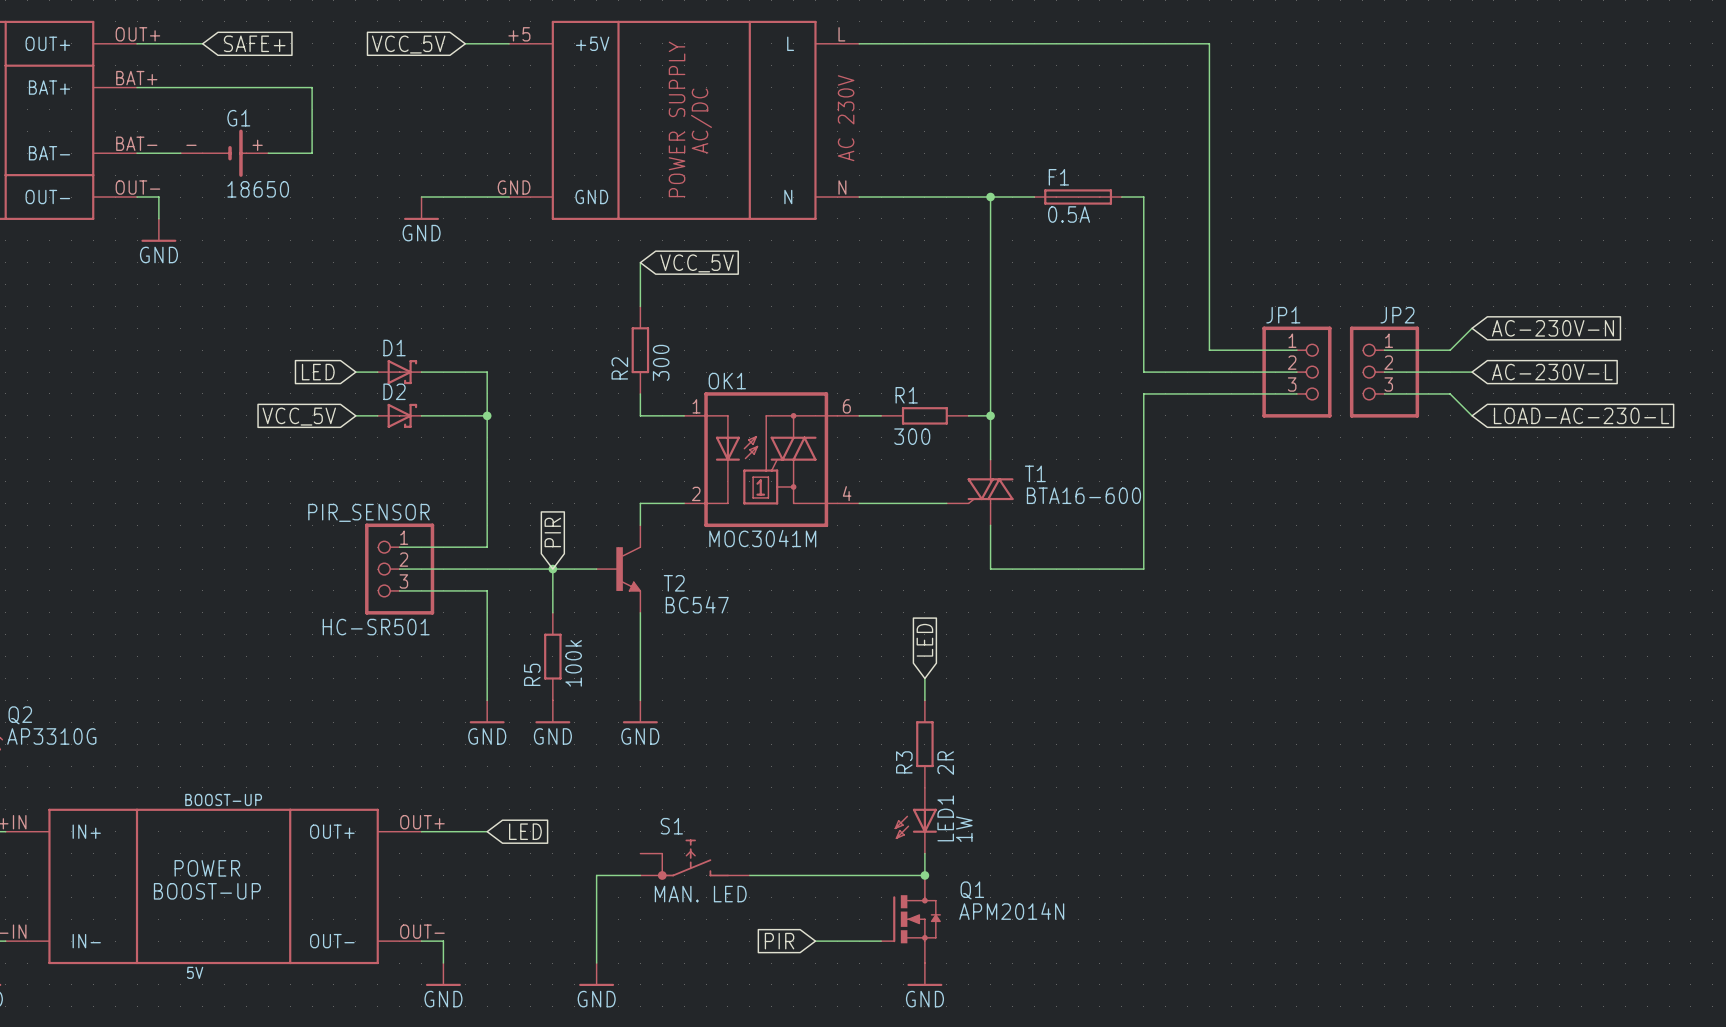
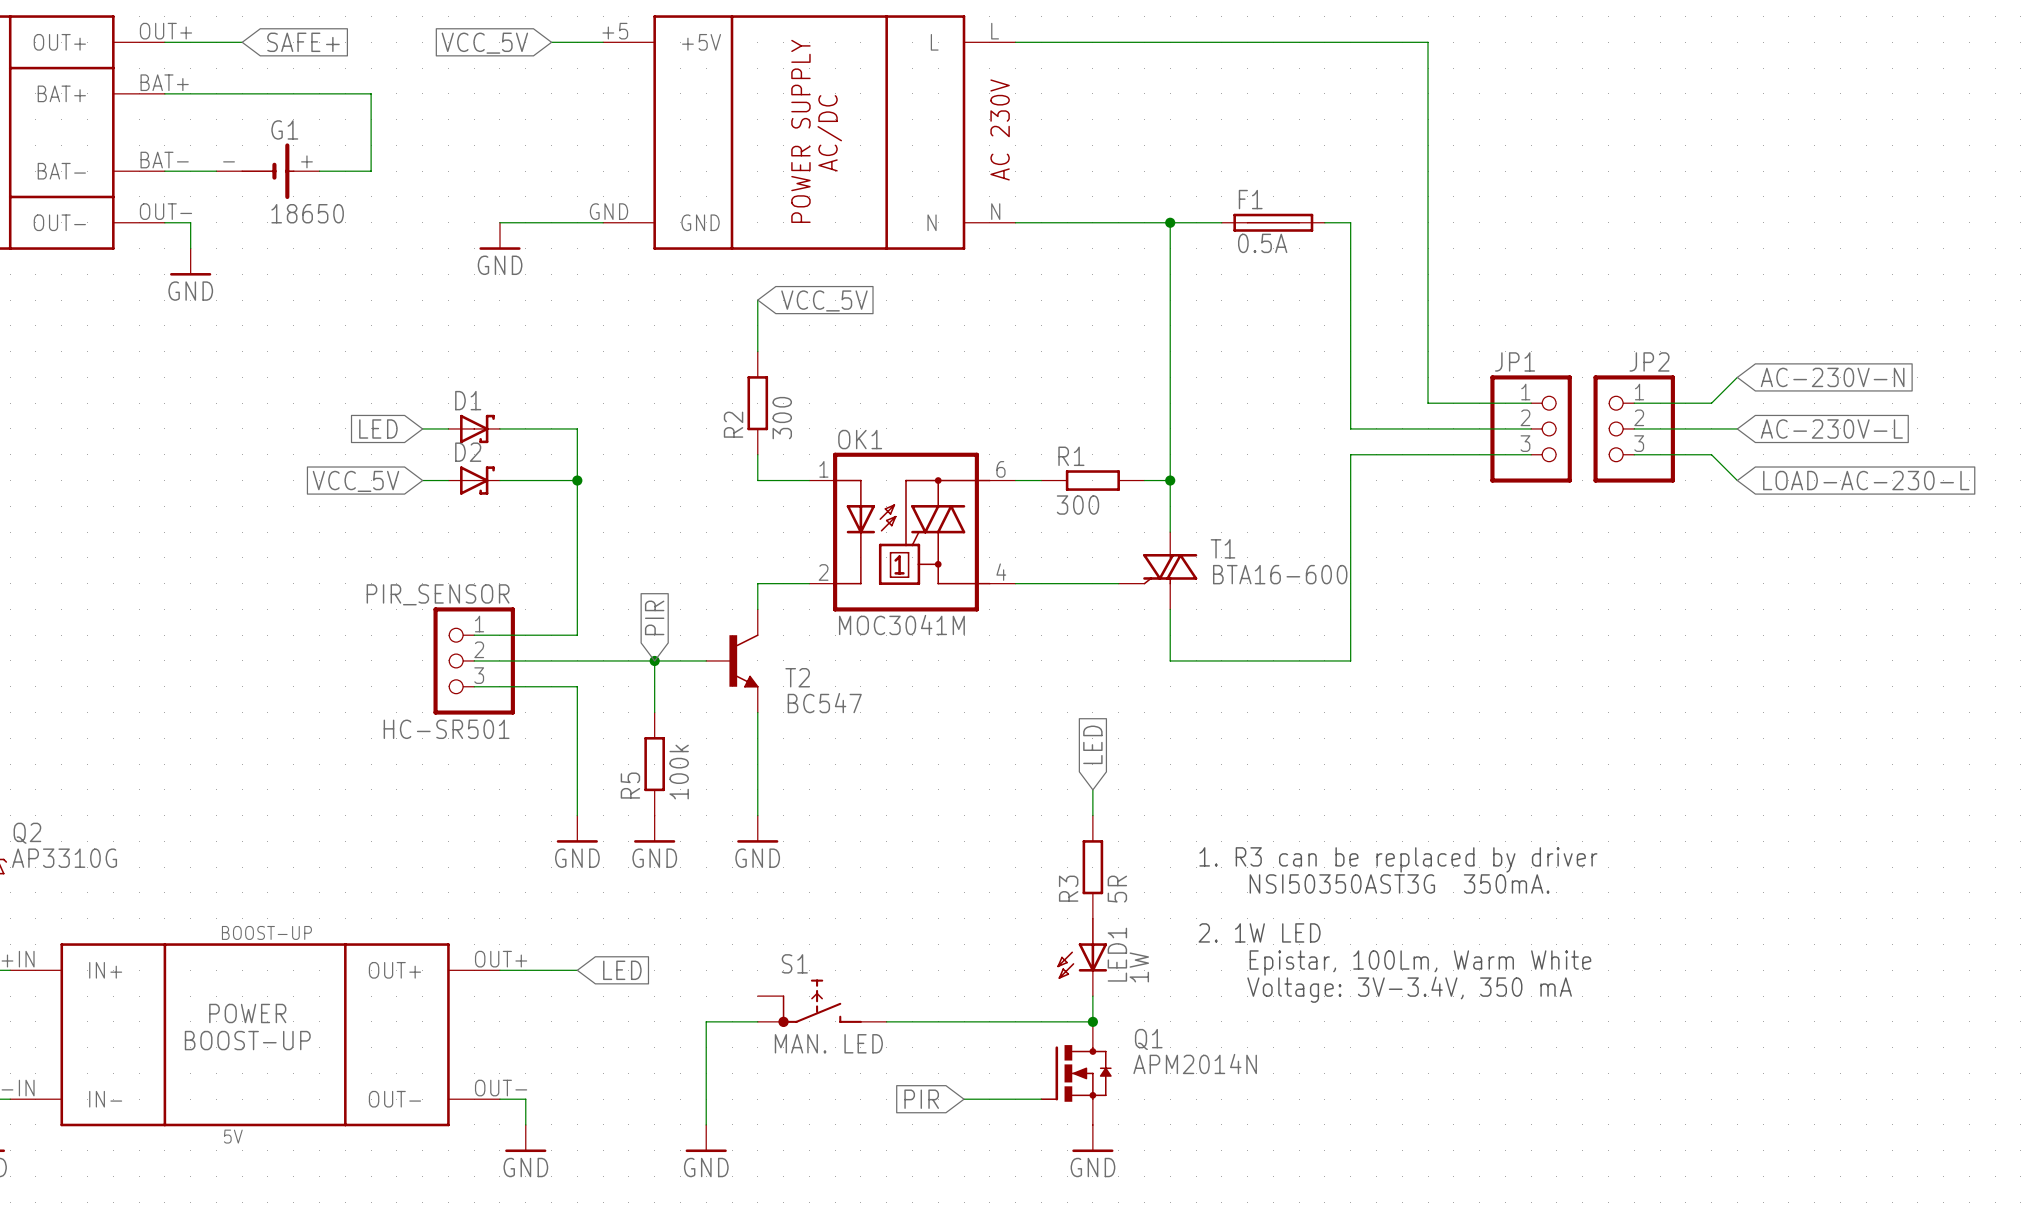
text: none -> 1. R3 can be replaced by driver (1398, 859)
text: none -> NSI50350AST3G 350mA. (1399, 883)
R3 value: 2R (945, 763) -> 5R (1117, 889)
text: none -> 2. 1W LED (1259, 932)
text: none -> Epistar, 100Lm, Warm White (1420, 963)
text: none -> Voltage: 3V-3.4V, 350 mA (1409, 989)

